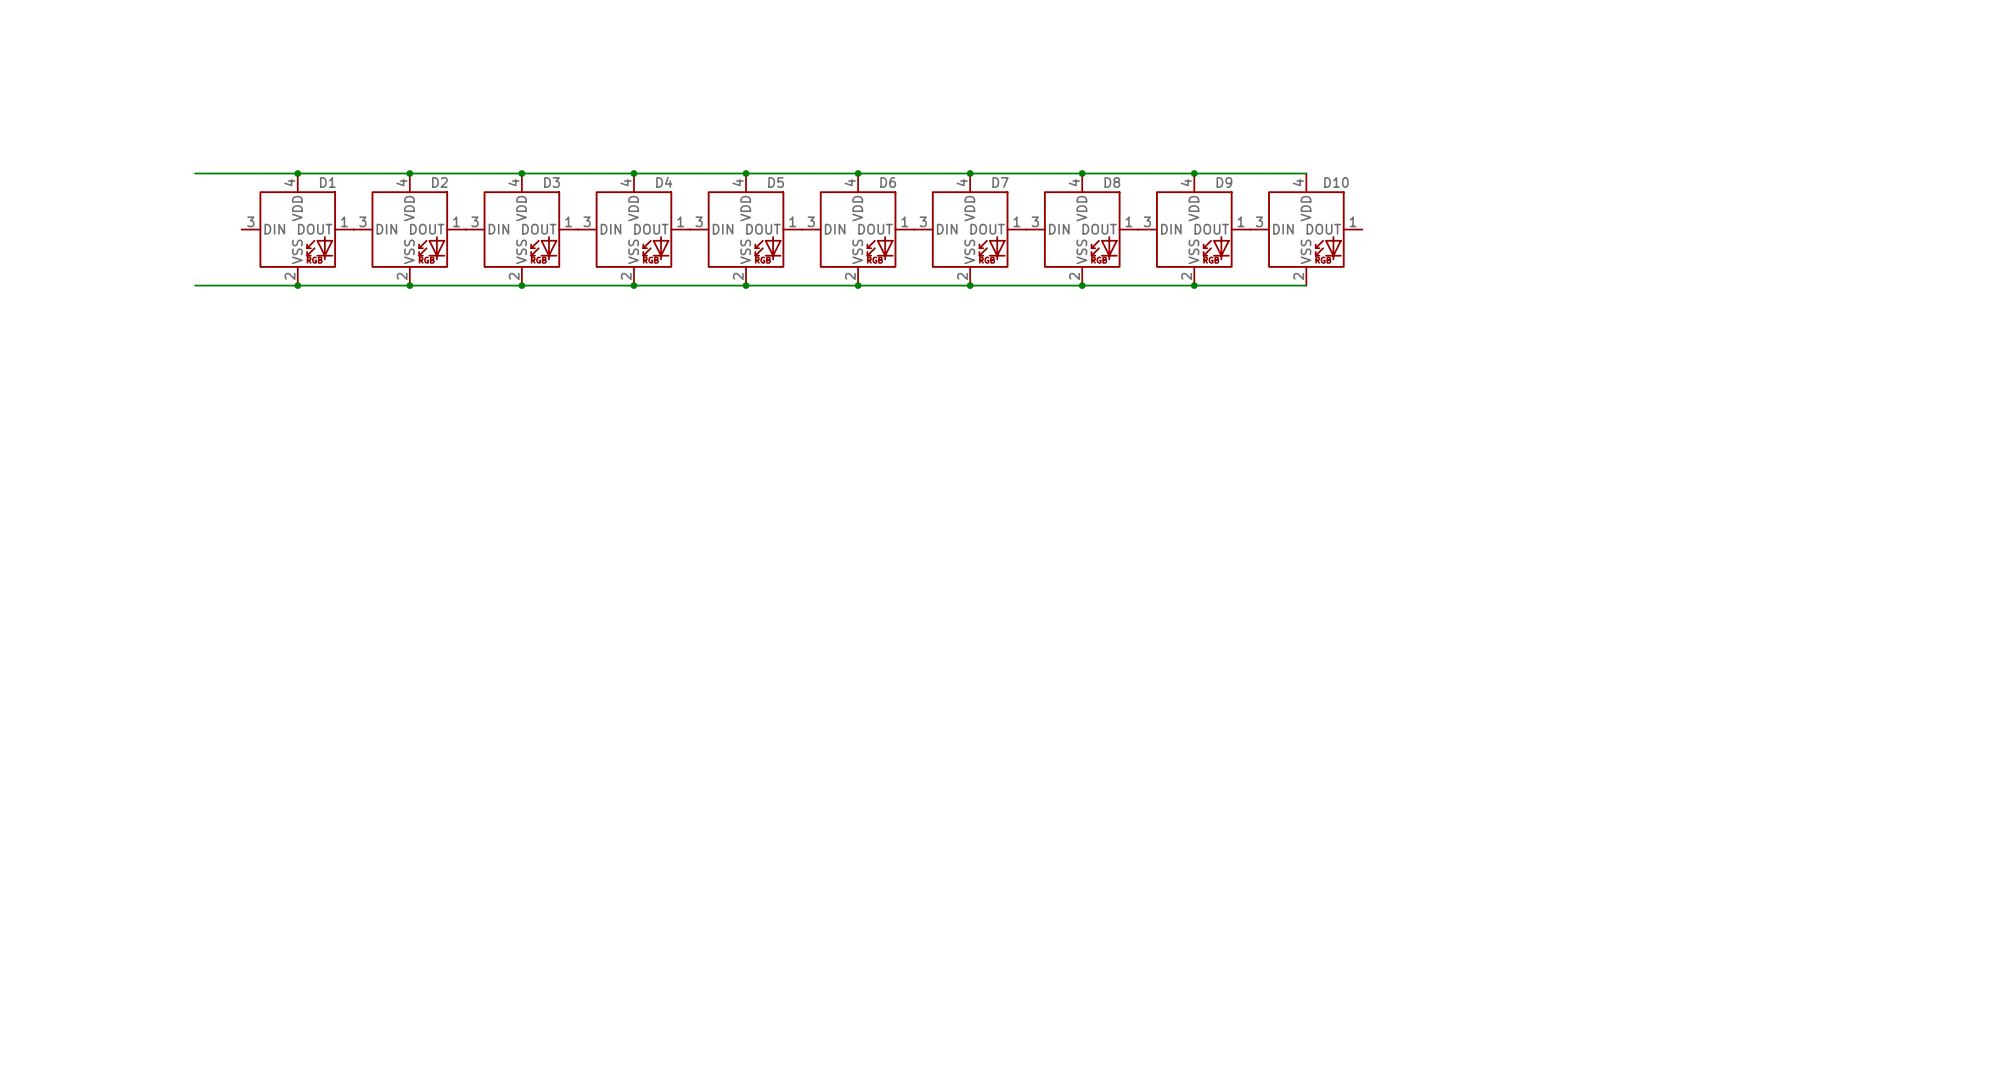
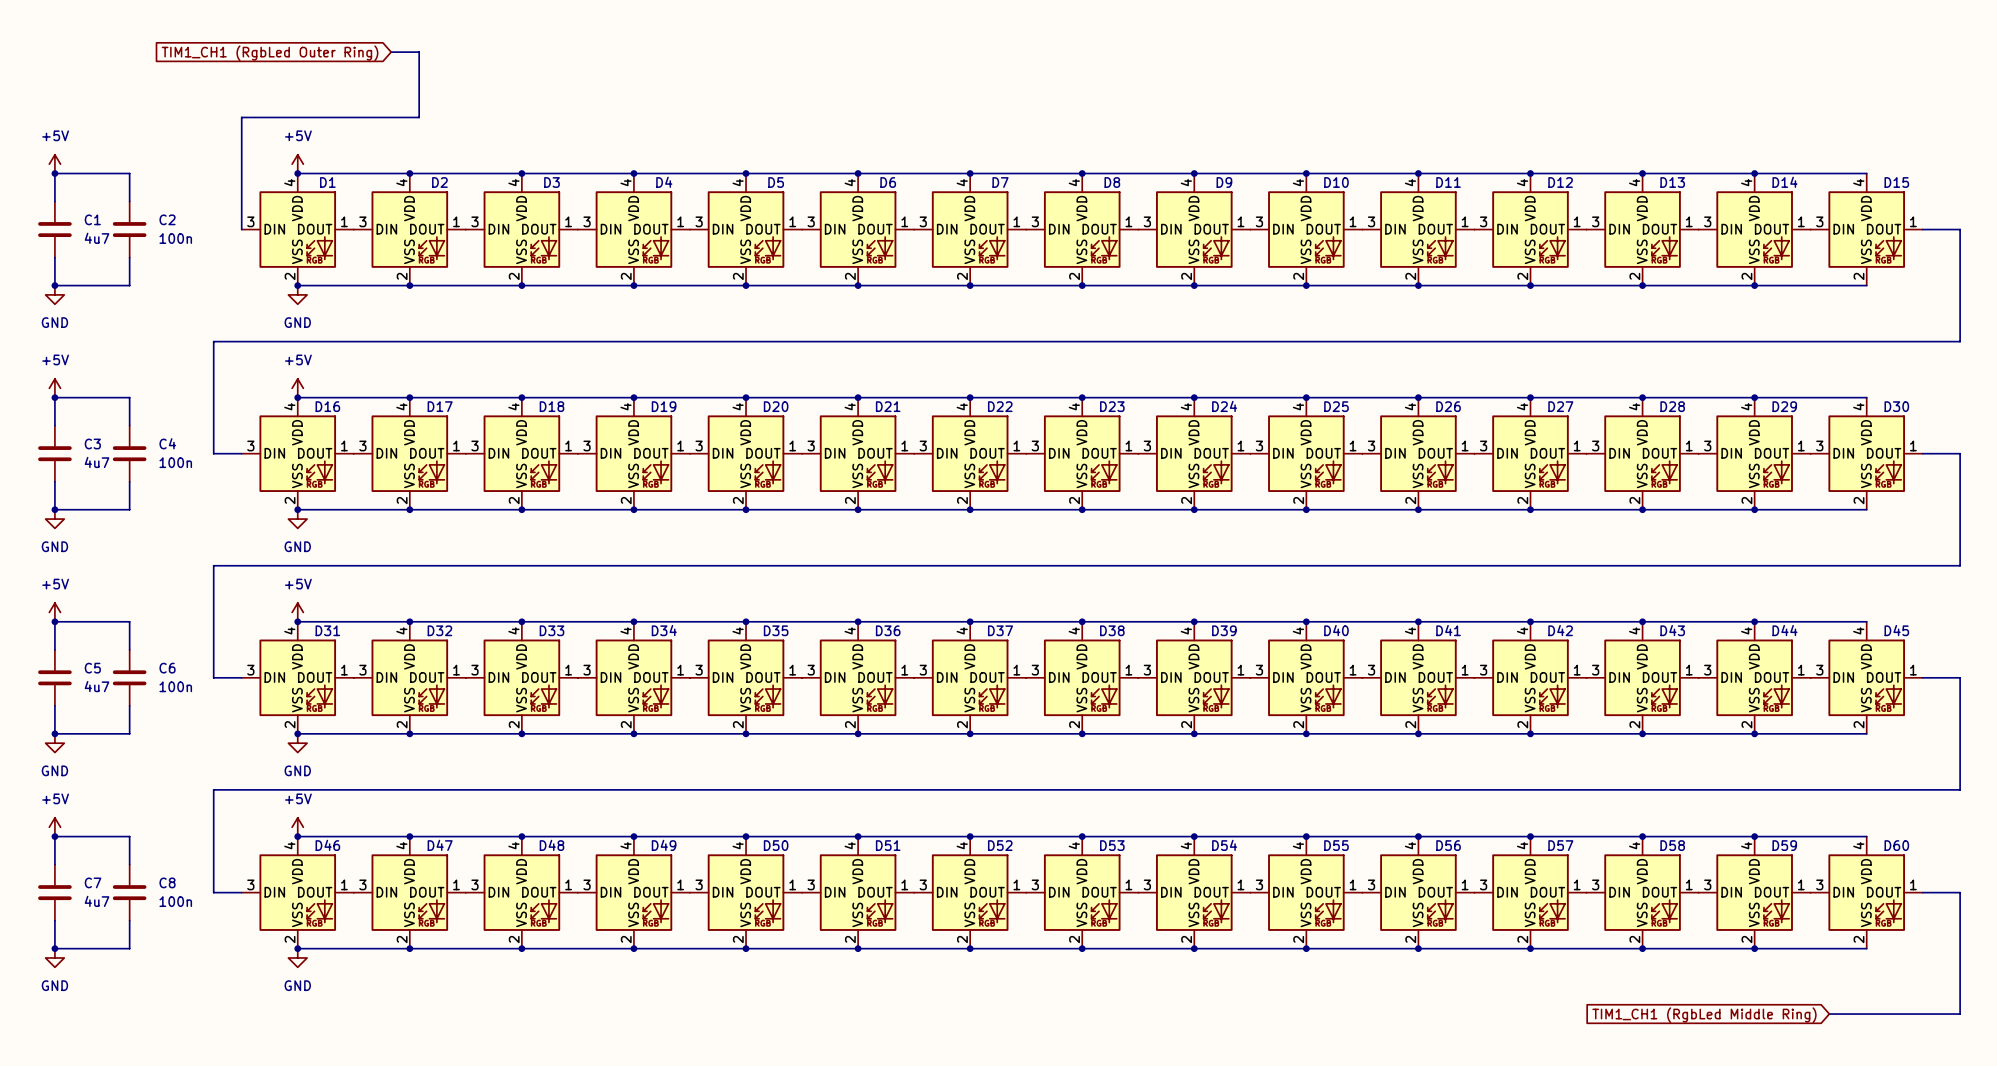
wire: none -> (391, 52) (419, 52) (419, 117) (241, 117) (241, 229)
global label: none -> TIM1_CH1 (RgbLed Outer Ring) (270, 53)
power symbol: none -> +5V (54, 164)
power symbol: none -> +5V (297, 164)
junction: none -> (54, 173)
wire: (195, 173) (297, 173) -> none
wire: none -> (1306, 173) (1866, 173)
junction: none -> (1306, 173)
junction: none -> (1418, 173)
junction: none -> (1530, 173)
junction: none -> (1642, 173)
junction: none -> (1754, 173)
wire: none -> (54, 201) (54, 173) (129, 173) (129, 201)
C1: none -> 4u7 (54, 229)
C2: none -> 100n (129, 229)
D11: none -> (1418, 229)
D12: none -> (1530, 229)
D13: none -> (1642, 229)
D14: none -> (1754, 229)
D15: none -> (1866, 229)
wire: none -> (1922, 229) (1960, 229) (1960, 341) (213, 341) (213, 453) (241, 453)
wire: none -> (54, 257) (54, 285) (129, 285) (129, 257)
junction: none -> (54, 285)
wire: (195, 285) (297, 285) -> none
wire: none -> (1306, 285) (1866, 285)
junction: none -> (1306, 285)
junction: none -> (1418, 285)
junction: none -> (1530, 285)
junction: none -> (1642, 285)
junction: none -> (1754, 285)
power symbol: none -> GND (54, 294)
power symbol: none -> GND (297, 294)
power symbol: none -> +5V (54, 388)
power symbol: none -> +5V (297, 388)
junction: none -> (54, 397)
wire: none -> (297, 397) (1866, 397)
junction: none -> (297, 397)
junction: none -> (409, 397)
junction: none -> (521, 397)
junction: none -> (633, 397)
junction: none -> (746, 397)
junction: none -> (858, 397)
junction: none -> (970, 397)
junction: none -> (1082, 397)
junction: none -> (1194, 397)
junction: none -> (1306, 397)
junction: none -> (1418, 397)
junction: none -> (1530, 397)
junction: none -> (1642, 397)
junction: none -> (1754, 397)
wire: none -> (54, 425) (54, 397) (129, 397) (129, 425)
C3: none -> 4u7 (54, 453)
C4: none -> 100n (129, 453)
D16: none -> (297, 453)
D17: none -> (409, 453)
D18: none -> (521, 453)
D19: none -> (633, 453)
D20: none -> (746, 453)
D21: none -> (858, 453)
D22: none -> (970, 453)
D23: none -> (1082, 453)
D24: none -> (1194, 453)
D25: none -> (1306, 453)
D26: none -> (1418, 453)
D27: none -> (1530, 453)
D28: none -> (1642, 453)
D29: none -> (1754, 453)
D30: none -> (1866, 453)
wire: none -> (1922, 453) (1960, 453) (1960, 565) (213, 565) (213, 677) (241, 677)
wire: none -> (54, 481) (54, 509) (129, 509) (129, 481)
junction: none -> (54, 509)
wire: none -> (297, 509) (1866, 509)
junction: none -> (297, 509)
junction: none -> (409, 509)
junction: none -> (521, 509)
junction: none -> (633, 509)
junction: none -> (746, 509)
junction: none -> (858, 509)
junction: none -> (970, 509)
junction: none -> (1082, 509)
junction: none -> (1194, 509)
junction: none -> (1306, 509)
junction: none -> (1418, 509)
junction: none -> (1530, 509)
junction: none -> (1642, 509)
junction: none -> (1754, 509)
power symbol: none -> GND (54, 519)
power symbol: none -> GND (297, 519)
power symbol: none -> +5V (54, 612)
power symbol: none -> +5V (297, 612)
junction: none -> (54, 621)
wire: none -> (297, 621) (1866, 621)
junction: none -> (297, 621)
junction: none -> (409, 621)
junction: none -> (521, 621)
junction: none -> (633, 621)
junction: none -> (746, 621)
junction: none -> (858, 621)
junction: none -> (970, 621)
junction: none -> (1082, 621)
junction: none -> (1194, 621)
junction: none -> (1306, 621)
junction: none -> (1418, 621)
junction: none -> (1530, 621)
junction: none -> (1642, 621)
junction: none -> (1754, 621)
wire: none -> (54, 649) (54, 621) (129, 621) (129, 649)
C5: none -> 4u7 (54, 677)
C6: none -> 100n (129, 677)
D31: none -> (297, 677)
D32: none -> (409, 677)
D33: none -> (521, 677)
D34: none -> (633, 677)
D35: none -> (746, 677)
D36: none -> (858, 677)
D37: none -> (970, 677)
D38: none -> (1082, 677)
D39: none -> (1194, 677)
D40: none -> (1306, 677)
D41: none -> (1418, 677)
D42: none -> (1530, 677)
D43: none -> (1642, 677)
D44: none -> (1754, 677)
D45: none -> (1866, 677)
wire: none -> (1922, 677) (1960, 677) (1960, 789) (213, 789) (213, 892) (241, 892)
wire: none -> (54, 705) (54, 733) (129, 733) (129, 705)
junction: none -> (54, 733)
wire: none -> (297, 733) (1866, 733)
junction: none -> (297, 733)
junction: none -> (409, 733)
junction: none -> (521, 733)
junction: none -> (633, 733)
junction: none -> (746, 733)
junction: none -> (858, 733)
junction: none -> (970, 733)
junction: none -> (1082, 733)
junction: none -> (1194, 733)
junction: none -> (1306, 733)
junction: none -> (1418, 733)
junction: none -> (1530, 733)
junction: none -> (1642, 733)
junction: none -> (1754, 733)
power symbol: none -> GND (54, 743)
power symbol: none -> GND (297, 743)
power symbol: none -> +5V (54, 827)
power symbol: none -> +5V (297, 827)
junction: none -> (54, 836)
wire: none -> (297, 836) (1866, 836)
junction: none -> (297, 836)
junction: none -> (409, 836)
junction: none -> (521, 836)
junction: none -> (633, 836)
junction: none -> (746, 836)
junction: none -> (858, 836)
junction: none -> (970, 836)
junction: none -> (1082, 836)
junction: none -> (1194, 836)
junction: none -> (1306, 836)
junction: none -> (1418, 836)
junction: none -> (1530, 836)
junction: none -> (1642, 836)
junction: none -> (1754, 836)
wire: none -> (54, 864) (54, 836) (129, 836) (129, 864)
C7: none -> 4u7 (54, 892)
C8: none -> 100n (129, 892)
D46: none -> (297, 892)
D47: none -> (409, 892)
D48: none -> (521, 892)
D49: none -> (633, 892)
D50: none -> (746, 892)
D51: none -> (858, 892)
D52: none -> (970, 892)
D53: none -> (1082, 892)
D54: none -> (1194, 892)
D55: none -> (1306, 892)
D56: none -> (1418, 892)
D57: none -> (1530, 892)
D58: none -> (1642, 892)
D59: none -> (1754, 892)
D60: none -> (1866, 892)
wire: none -> (1922, 892) (1960, 892) (1960, 1014) (1829, 1014)
wire: none -> (54, 920) (54, 948) (129, 948) (129, 920)
junction: none -> (54, 948)
wire: none -> (297, 948) (1866, 948)
junction: none -> (297, 948)
junction: none -> (409, 948)
junction: none -> (521, 948)
junction: none -> (633, 948)
junction: none -> (746, 948)
junction: none -> (858, 948)
junction: none -> (970, 948)
junction: none -> (1082, 948)
junction: none -> (1194, 948)
junction: none -> (1306, 948)
junction: none -> (1418, 948)
junction: none -> (1530, 948)
junction: none -> (1642, 948)
junction: none -> (1754, 948)
power symbol: none -> GND (54, 957)
power symbol: none -> GND (297, 957)
global label: none -> TIM1_CH1 (RgbLed Middle Ring) (1704, 1015)

